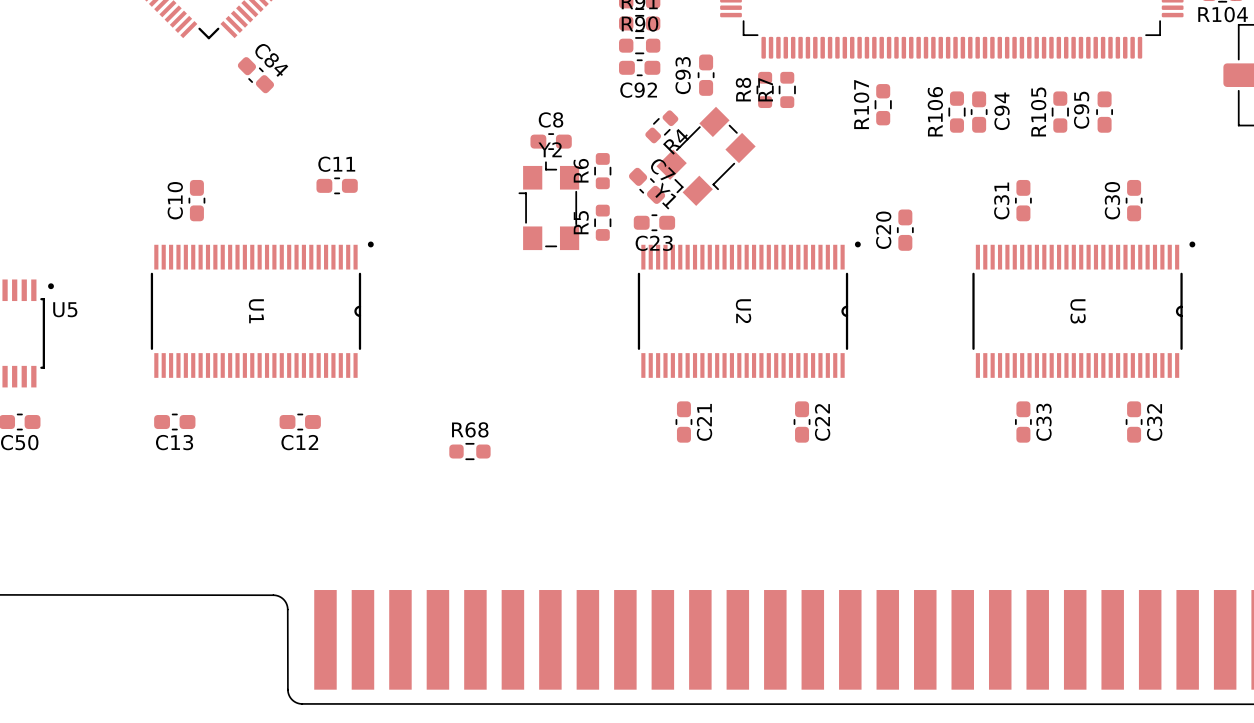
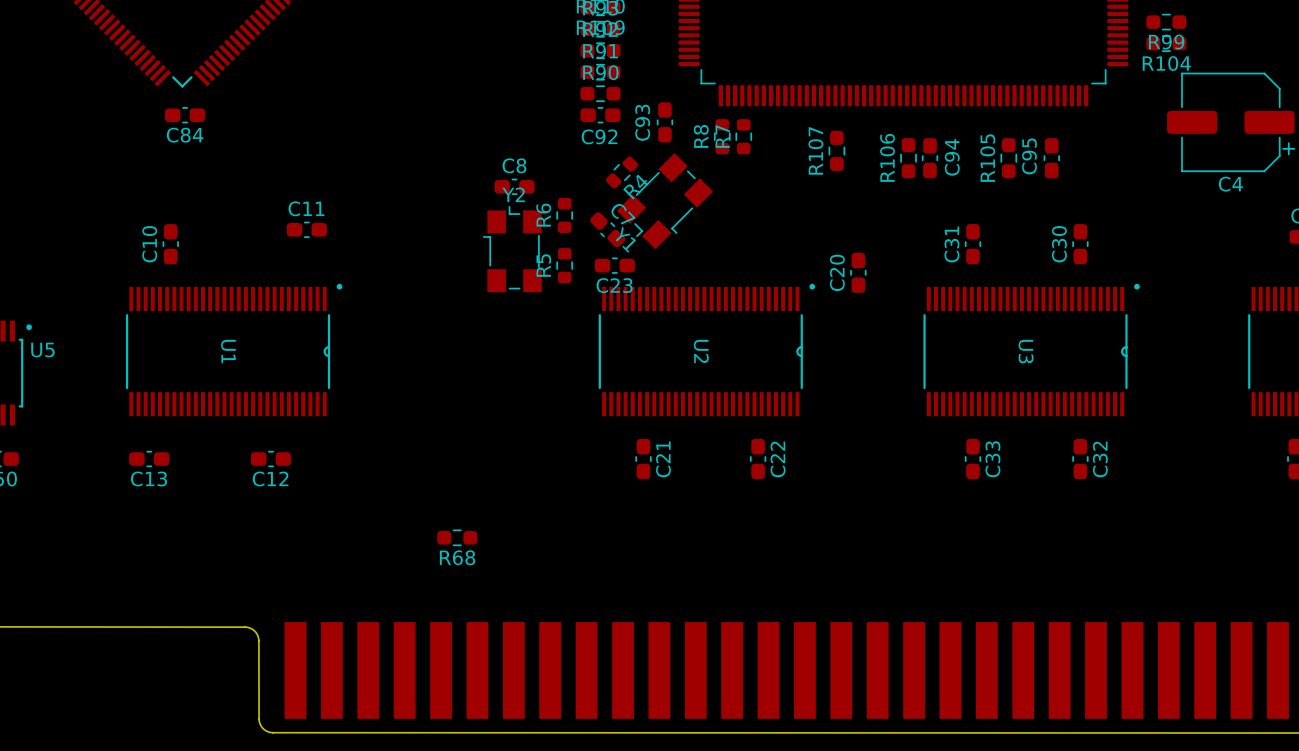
C84 name position: C84 (271, 60) -> C84 (185, 135)
C84 rotation: 0° (255, 75) -> 45° counterclockwise (185, 115)
C84 position: (255, 75) -> (185, 115)
R68 name position: R68 (470, 429) -> R68 (457, 557)
R68 position: (469, 451) -> (457, 537)

